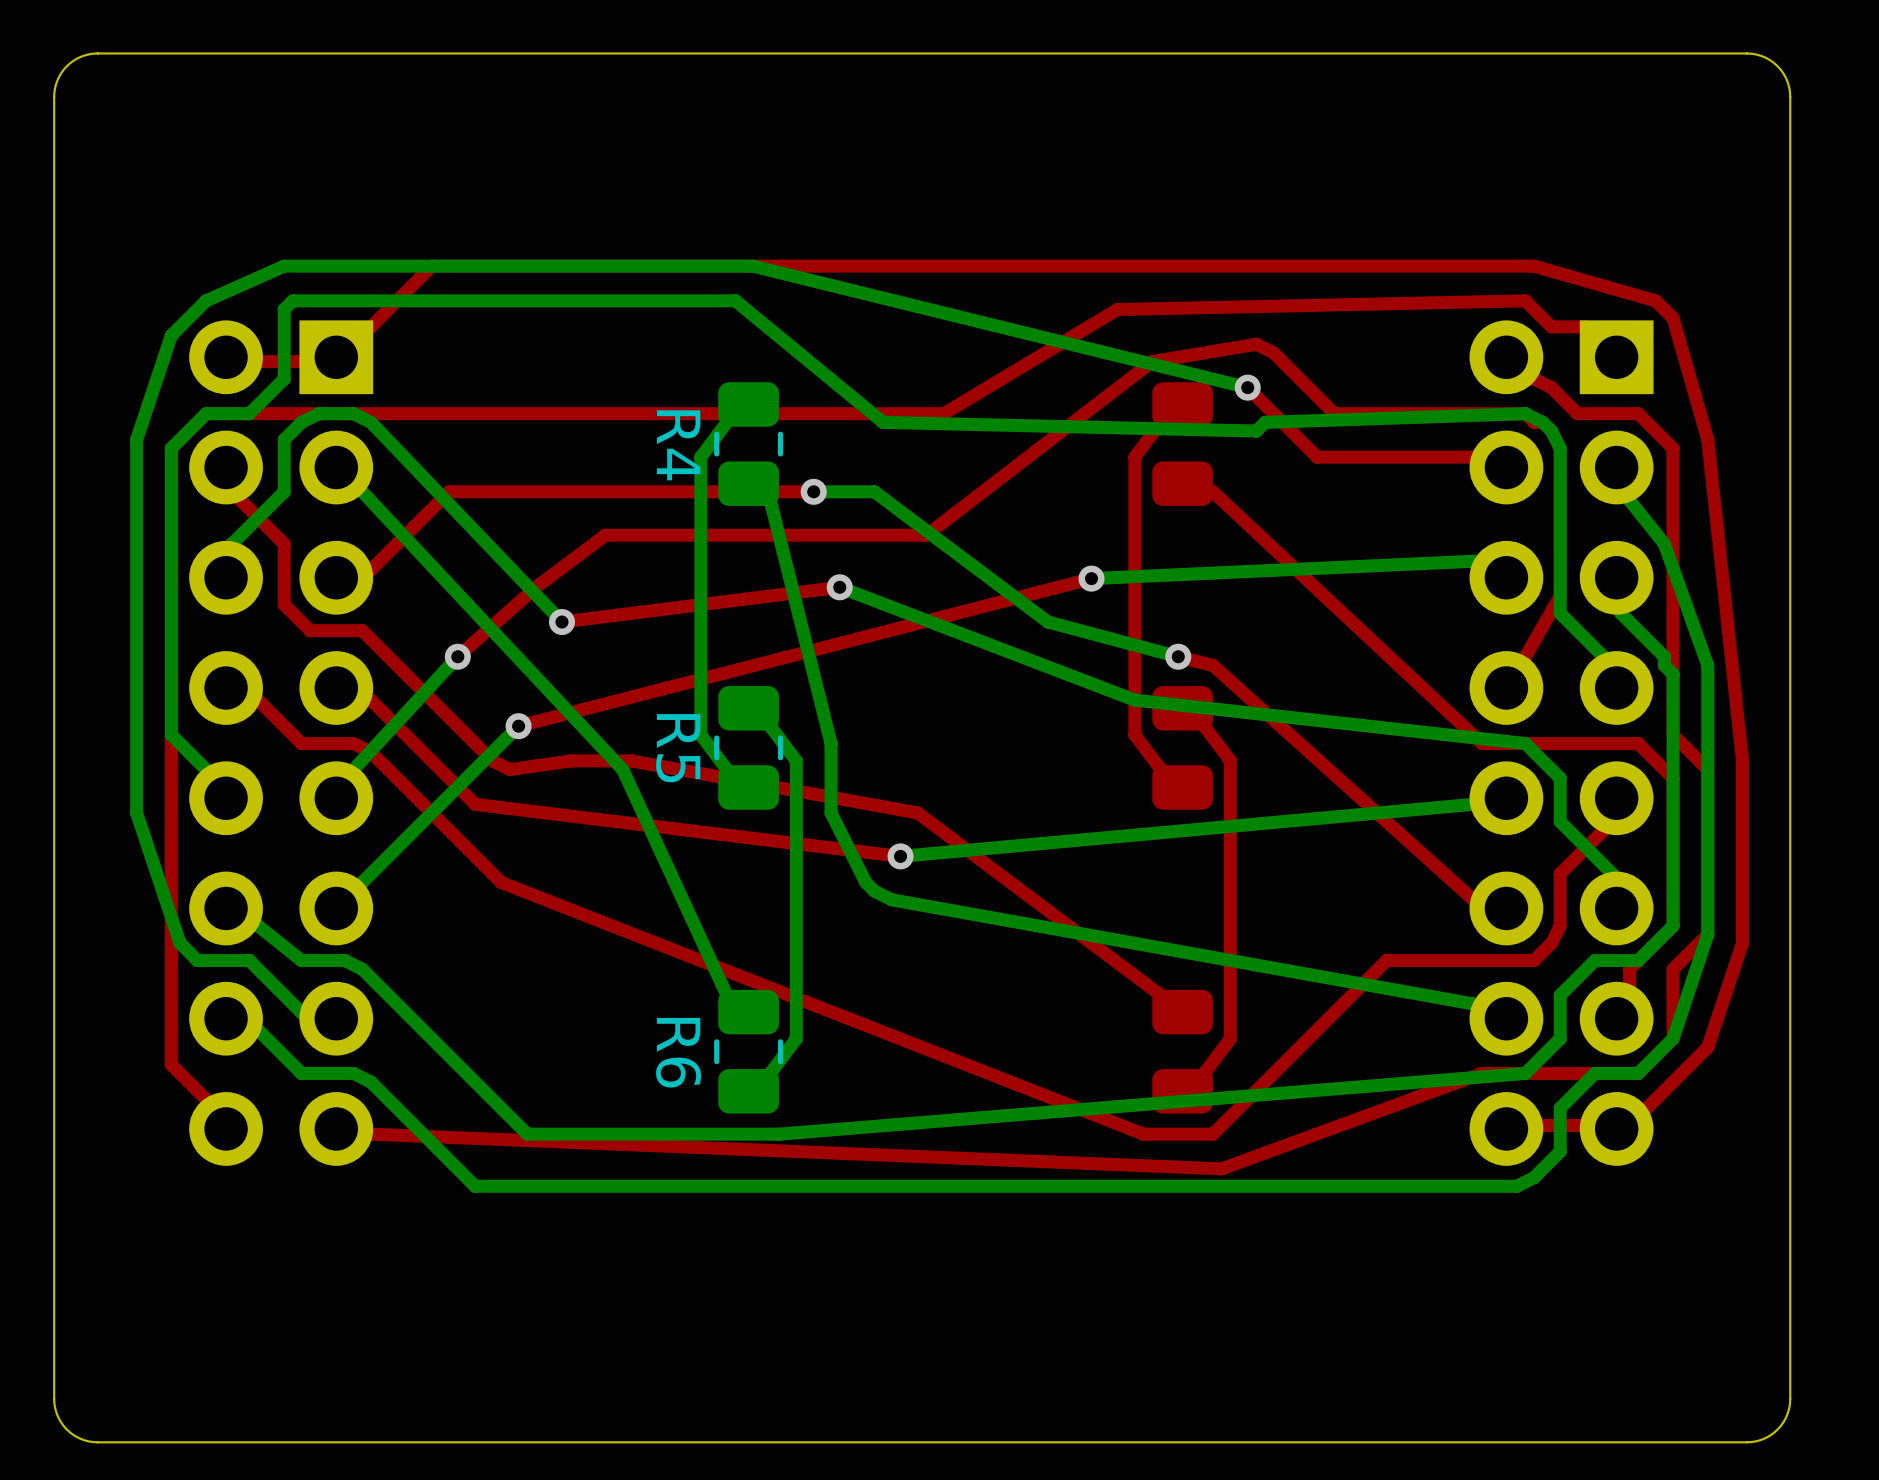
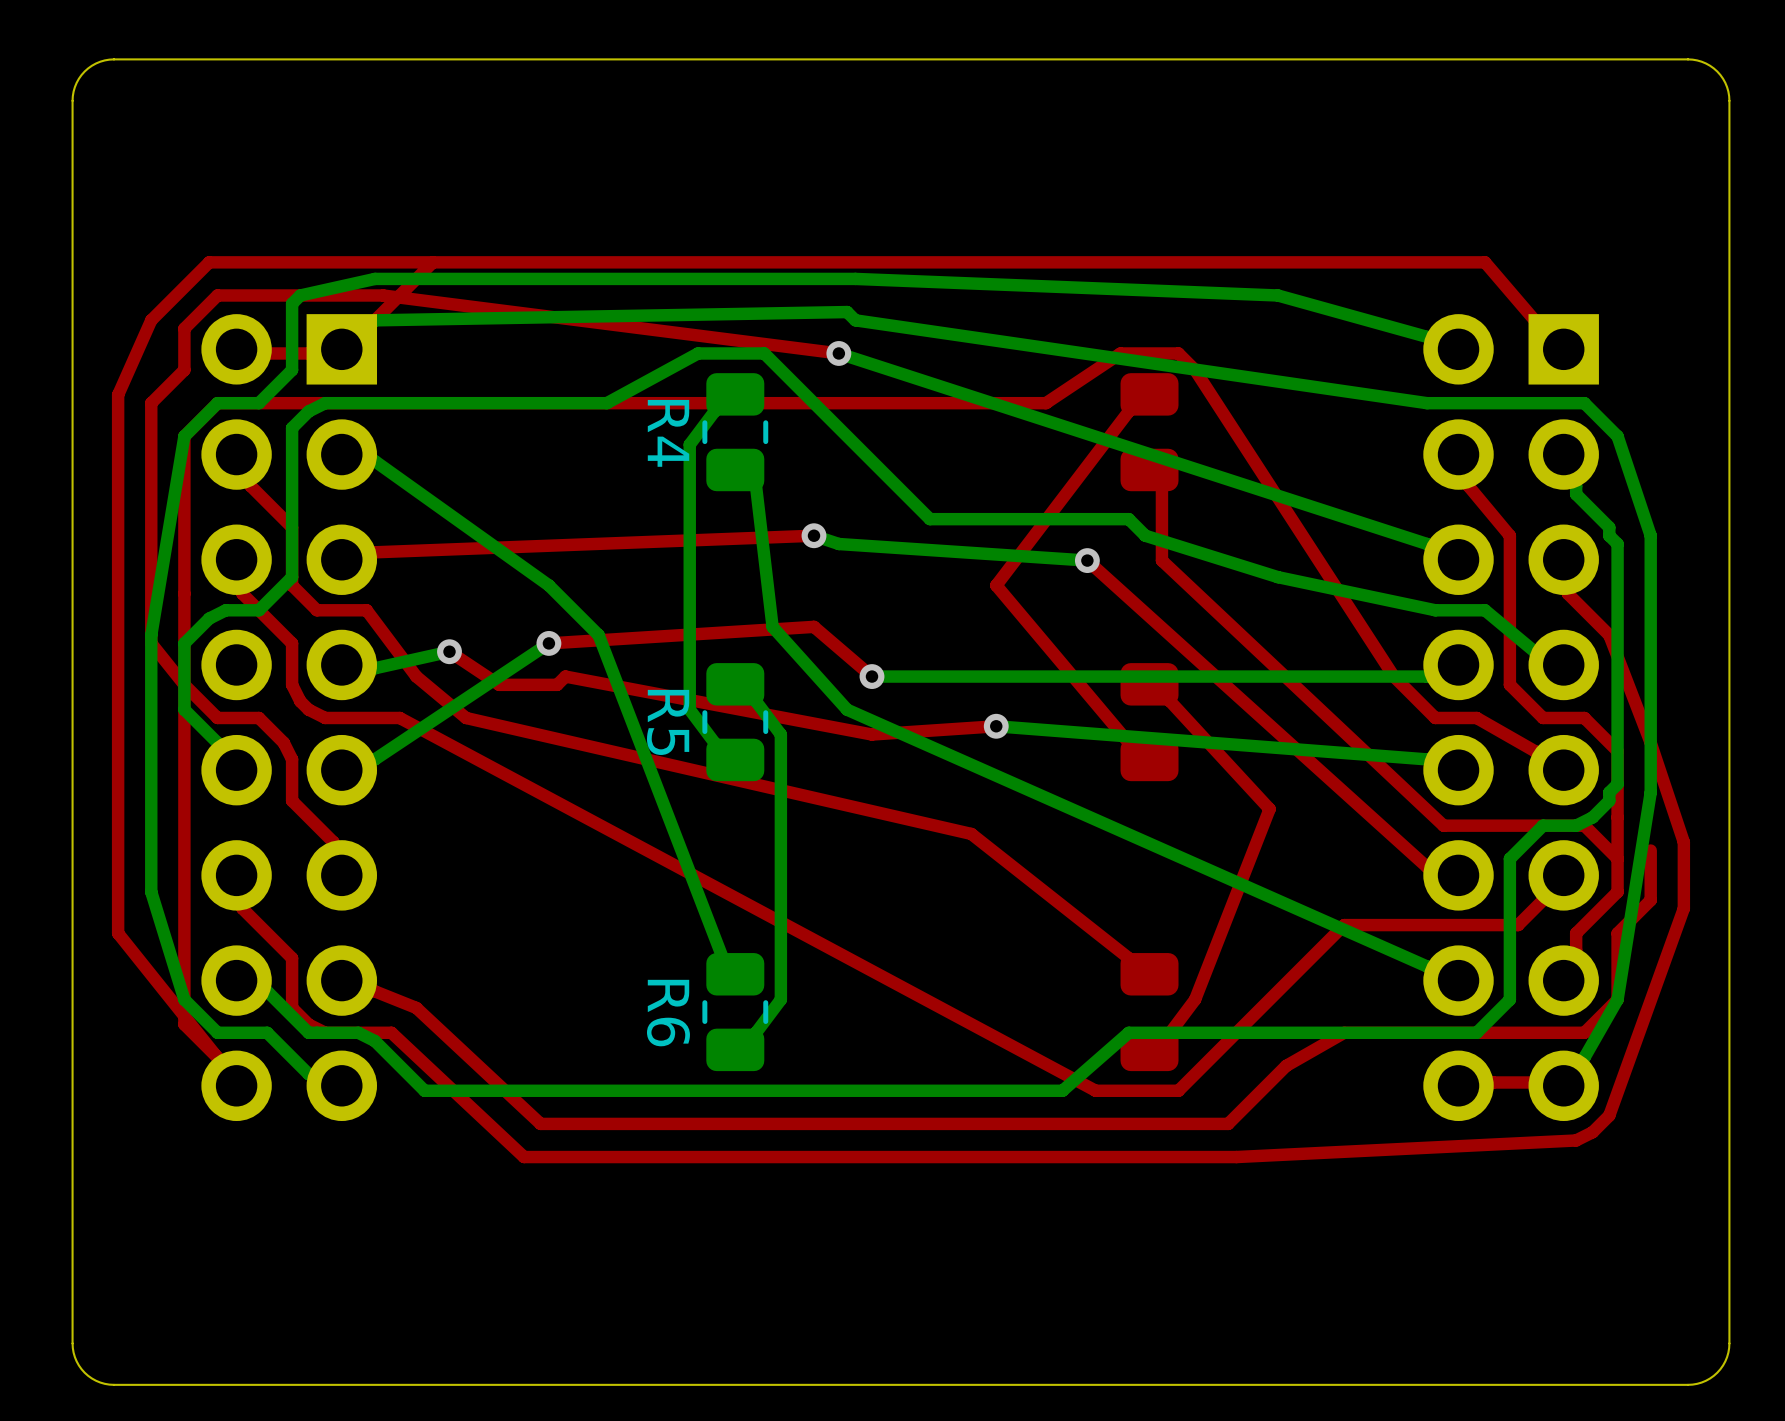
top track: none -> (432, 262) (209, 262) (151, 320) (118, 394) (118, 933) (217, 1057)
top track: (1534, 266) (1655, 300) (1673, 318) (1707, 439) (1742, 760) (1742, 873) -> (1563, 559) (1567, 593) (1609, 635) (1650, 742) (1683, 842)
top track: none -> (1485, 262) (1534, 320)
bottom track: (292, 300) (735, 300) (883, 422) (1256, 431) (1265, 422) (1525, 413) (1542, 422) (1551, 431) (1560, 448) (1560, 613) (1603, 656) (1616, 687) -> (358, 403) (606, 403) (698, 353) (764, 353) (929, 519) (1128, 519) (1145, 535) (1277, 577) (1435, 610) (1485, 610) (1534, 651) (1563, 664)
bottom track: none -> (300, 295) (374, 278) (855, 278) (1277, 295) (1427, 336) (1458, 349)
top track: (1586, 326) (1551, 326) (1525, 300) (1117, 309) (943, 413) -> (1435, 717) (1393, 676) (1195, 370) (1178, 353) (1120, 353) (1045, 403) (921, 403)
bottom track: none -> (341, 349) (374, 320) (847, 312) (855, 320) (1427, 403) (1584, 403) (1617, 436) (1650, 535) (1650, 643)
top track: (1506, 357) (1534, 378) (1551, 387) (1577, 413) (1638, 413) (1673, 448) (1673, 734) (1707, 769) (1707, 882) -> none
top track: none -> (838, 353) (383, 295) (217, 295) (184, 328) (184, 370) (151, 403) (151, 643) (184, 684) (217, 717) (258, 717) (283, 742) (292, 759) (292, 800) (333, 842) (341, 875)
via: none -> (838, 353)
top track: (1247, 387) (1317, 457) (1473, 457) (1506, 467) -> (1509, 535) (1468, 486) (1458, 454)
bottom track: (1247, 387) (752, 266) (284, 266) (206, 300) (171, 335) (136, 439) (136, 656) -> none
via: (1247, 387) -> none
bottom track: (353, 413) (371, 422) (561, 622) -> none
top track: (1160, 422) (1134, 457) (1134, 734) (1160, 769) -> (1128, 411) (996, 585) (1128, 742)
bottom track: (171, 448) (171, 665) -> (184, 436) (151, 635)
bottom track: (336, 467) (362, 491) (622, 769) (726, 995) (748, 1012) -> (341, 454) (374, 461) (548, 585) (598, 635) (722, 958) (735, 974)
top track: (1182, 483) (1213, 491) (1482, 743) -> (1149, 469) (1161, 486) (1161, 560) (1443, 825) (1584, 825) (1617, 858)
bottom track: (284, 491) (232, 543) (226, 577) -> (292, 477) (292, 577) (258, 610) (225, 610) (209, 618) (184, 643)
top track: (813, 491) (449, 491) (371, 569) -> (814, 535) (374, 552)
bottom track: (813, 491) (874, 491) (1048, 622) (1178, 656) -> none
via: (813, 491) -> none
bottom track: (770, 500) (831, 743) (831, 812) (865, 882) (874, 891) (891, 899) (1473, 1003) -> (756, 486) (772, 626) (847, 709) (1427, 966)
bottom track: (1629, 500) (1664, 543) (1707, 665) -> (1576, 486) (1576, 494) (1609, 527) (1609, 535) (1617, 544) (1617, 651)
bottom track: none -> (814, 535) (838, 544) (1087, 560)
via: none -> (814, 535)
top track: (1560, 552) (1560, 448) (1551, 431) (1542, 422) (1534, 422) (1525, 413) (1334, 413) (1273, 352) (1256, 344) (1152, 361) (926, 535) (605, 535) (535, 587) (457, 656) -> none
bottom track: (1473, 561) (1091, 578) -> (1427, 544) (838, 353)
bottom track: (1616, 577) (1621, 613) (1664, 656) (1664, 665) (1673, 674) -> none
top track: (1091, 578) (518, 726) -> none
via position: (1091, 578) -> (1087, 560)
top track: (839, 587) (561, 622) -> none
bottom track: (839, 587) (1134, 700) (1525, 743) (1560, 778) (1560, 821) (1612, 873) (1616, 908) -> none
via: (839, 587) -> none
top track: (1560, 595) (1506, 687) -> (1509, 577) (1509, 684) (1543, 717)
via: (561, 622) -> none
top track: (362, 630) (492, 760) (509, 769) (570, 760) (631, 760) (917, 812) (1160, 995) -> (366, 610) (416, 676) (466, 717) (971, 833) (1128, 958)
bottom track: (457, 656) (353, 769) (336, 798) -> (548, 643) (374, 759) (341, 770)
via position: (457, 656) -> (449, 651)
top track: (1178, 656) (1213, 665) (1473, 899) -> (1087, 560) (1427, 867)
via: (1178, 656) -> none
top track: none -> (548, 643) (814, 626) (871, 676)
via: none -> (548, 643)
top track: none -> (449, 651) (499, 684) (557, 684) (565, 676) (871, 734) (996, 726)
bottom track: none -> (449, 651) (374, 668) (341, 664)
top track: (226, 687) (258, 700) (301, 743) (318, 743) -> (236, 559) (242, 593) (292, 643) (292, 684) (300, 701) (308, 709) (325, 717)
top track: (336, 687) (371, 700) (475, 804) (900, 856) -> none
bottom track: none -> (1458, 664) (1427, 676) (871, 676)
via: none -> (871, 676)
bottom track: (518, 726) (336, 908) -> none
via: (518, 726) -> none
top track: (1204, 726) (1230, 760) (1230, 1038) -> (1170, 701) (1269, 809) (1195, 999)
top track: (353, 743) (371, 752) (501, 882) (1143, 1134) -> (358, 717) (399, 717) (1095, 1090) (1112, 1090)
top track: (1594, 743) (1525, 743) -> (1563, 770) (1476, 717)
via: none -> (996, 726)
bottom track: (1506, 798) (1473, 804) (900, 856) -> (1458, 770) (1427, 759) (996, 726)
top track: (1616, 798) (1603, 830) (1560, 873) (1560, 925) (1551, 943) (1534, 960) -> (1563, 875) (1543, 900) (1518, 925) (1485, 925)
bottom track: (136, 812) (180, 943) (197, 960) (249, 960) (301, 1012) (336, 1018) -> (151, 784) (151, 891) (184, 999) (217, 1032) (267, 1032) (308, 1074) (341, 1085)
bottom track: (1673, 812) (1673, 925) (1638, 960) (1594, 960) (1560, 995) -> (1617, 784) (1609, 792) (1609, 800) (1592, 817) (1576, 825) (1543, 825) (1509, 858) (1509, 958)
bottom track: (1707, 821) (1707, 934) (1673, 1038) (1638, 1073) (1594, 1073) (1560, 1108) (1560, 1151) (1534, 1177) (1516, 1186) (475, 1186) (423, 1134) -> (1650, 792) (1617, 999) (1584, 1057) (1563, 1085)
via: (900, 856) -> none
bottom track: (226, 908) (258, 925) (301, 960) (344, 960) (362, 969) (527, 1134) -> (424, 1090) (524, 1090)
top track: (1742, 943) (1707, 1047) (1647, 1108) (1616, 1128) -> (1683, 908) (1609, 1115) (1592, 1132) (1576, 1140) (1236, 1157) (524, 1157) (391, 1032) (325, 1032) (308, 1024) (292, 1007) (292, 958) (242, 908) (236, 875)
top track: (1482, 1073) (1221, 1168) (371, 1134) (336, 1128) -> (1435, 1032) (1344, 1032) (1286, 1065) (1228, 1123) (540, 1123) (416, 1007) (341, 980)
bottom track: (1525, 1073) (779, 1134) -> (1476, 1032) (1128, 1032) (1062, 1090) (764, 1090)

